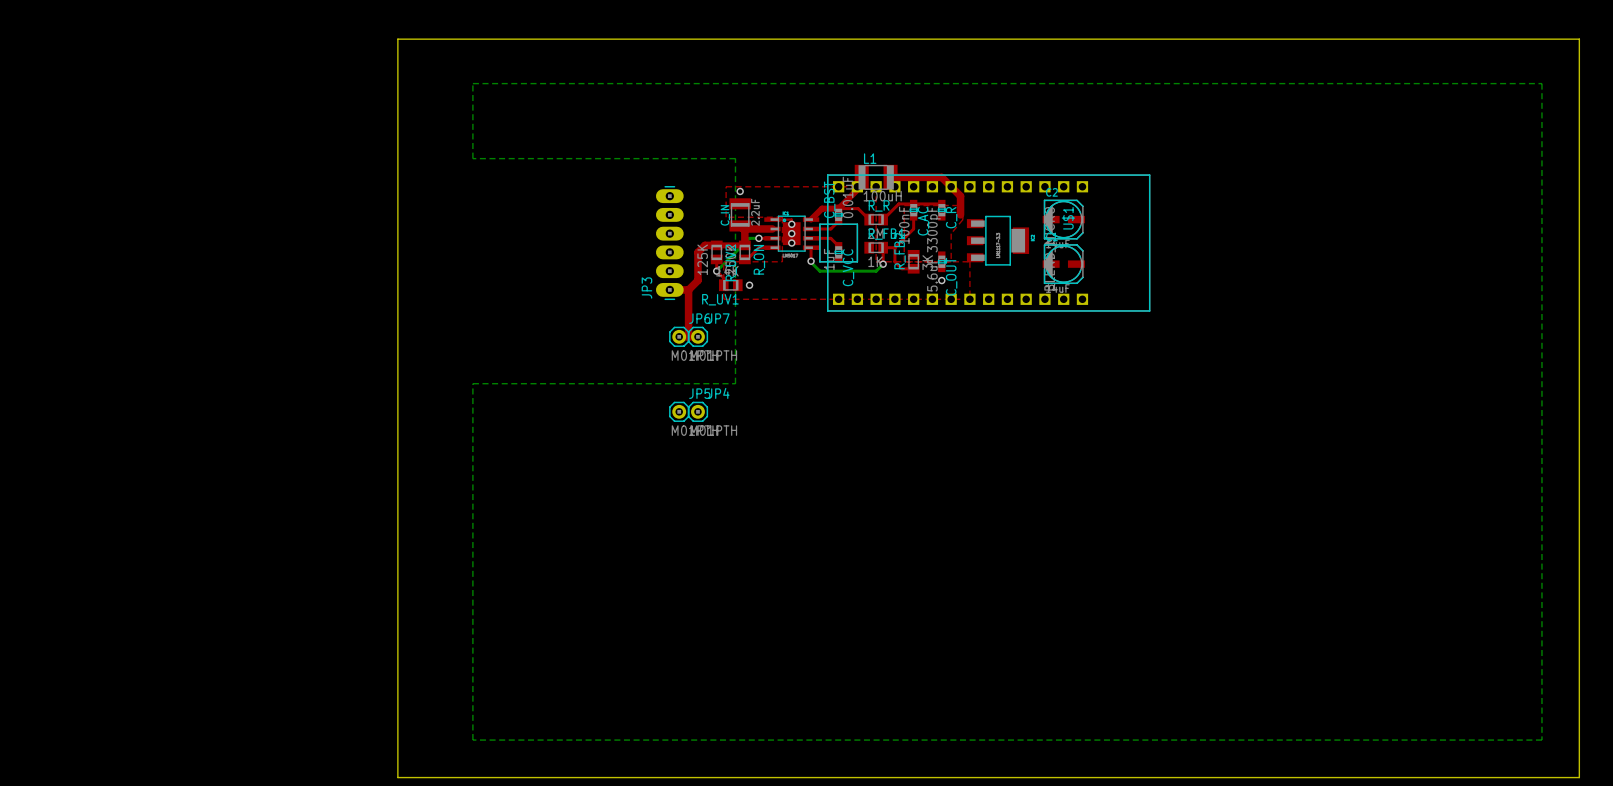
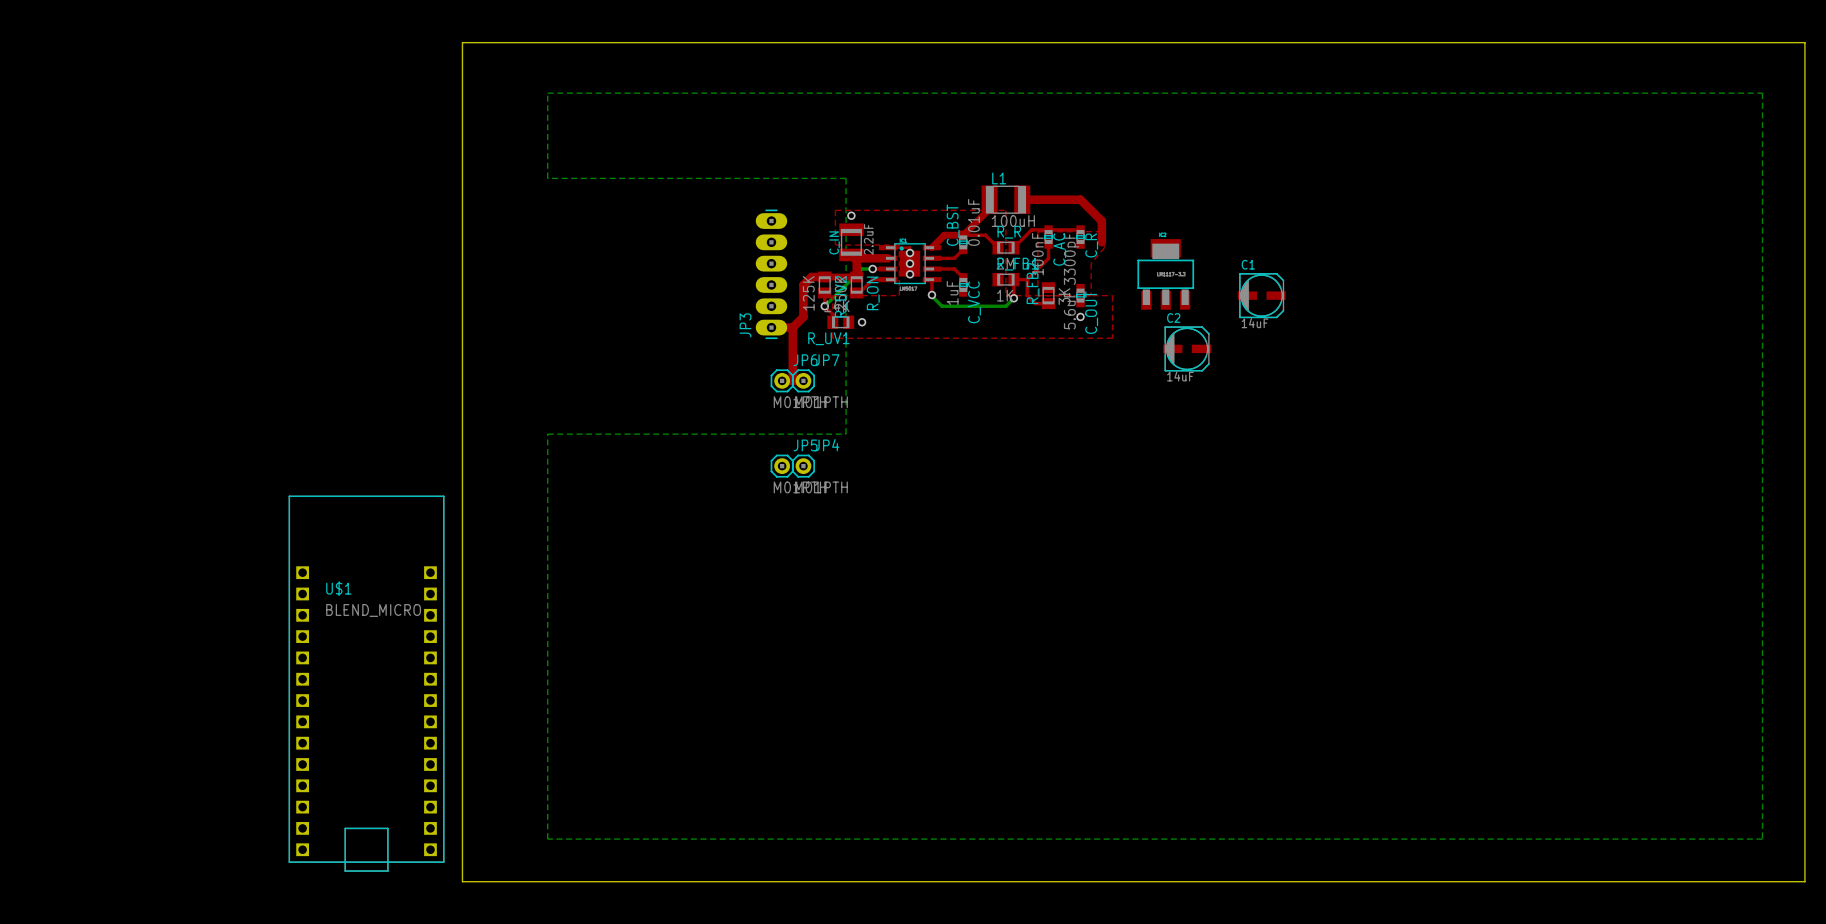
C2 position: (1063, 219) -> (1187, 348)
part rotation: 0° (998, 240) -> 90° counterclockwise (1165, 274)
U$1 rotation: 0° (984, 243) -> 90° counterclockwise (366, 683)
U$1 position: (984, 243) -> (366, 683)
C1 position: (1063, 264) -> (1261, 295)

